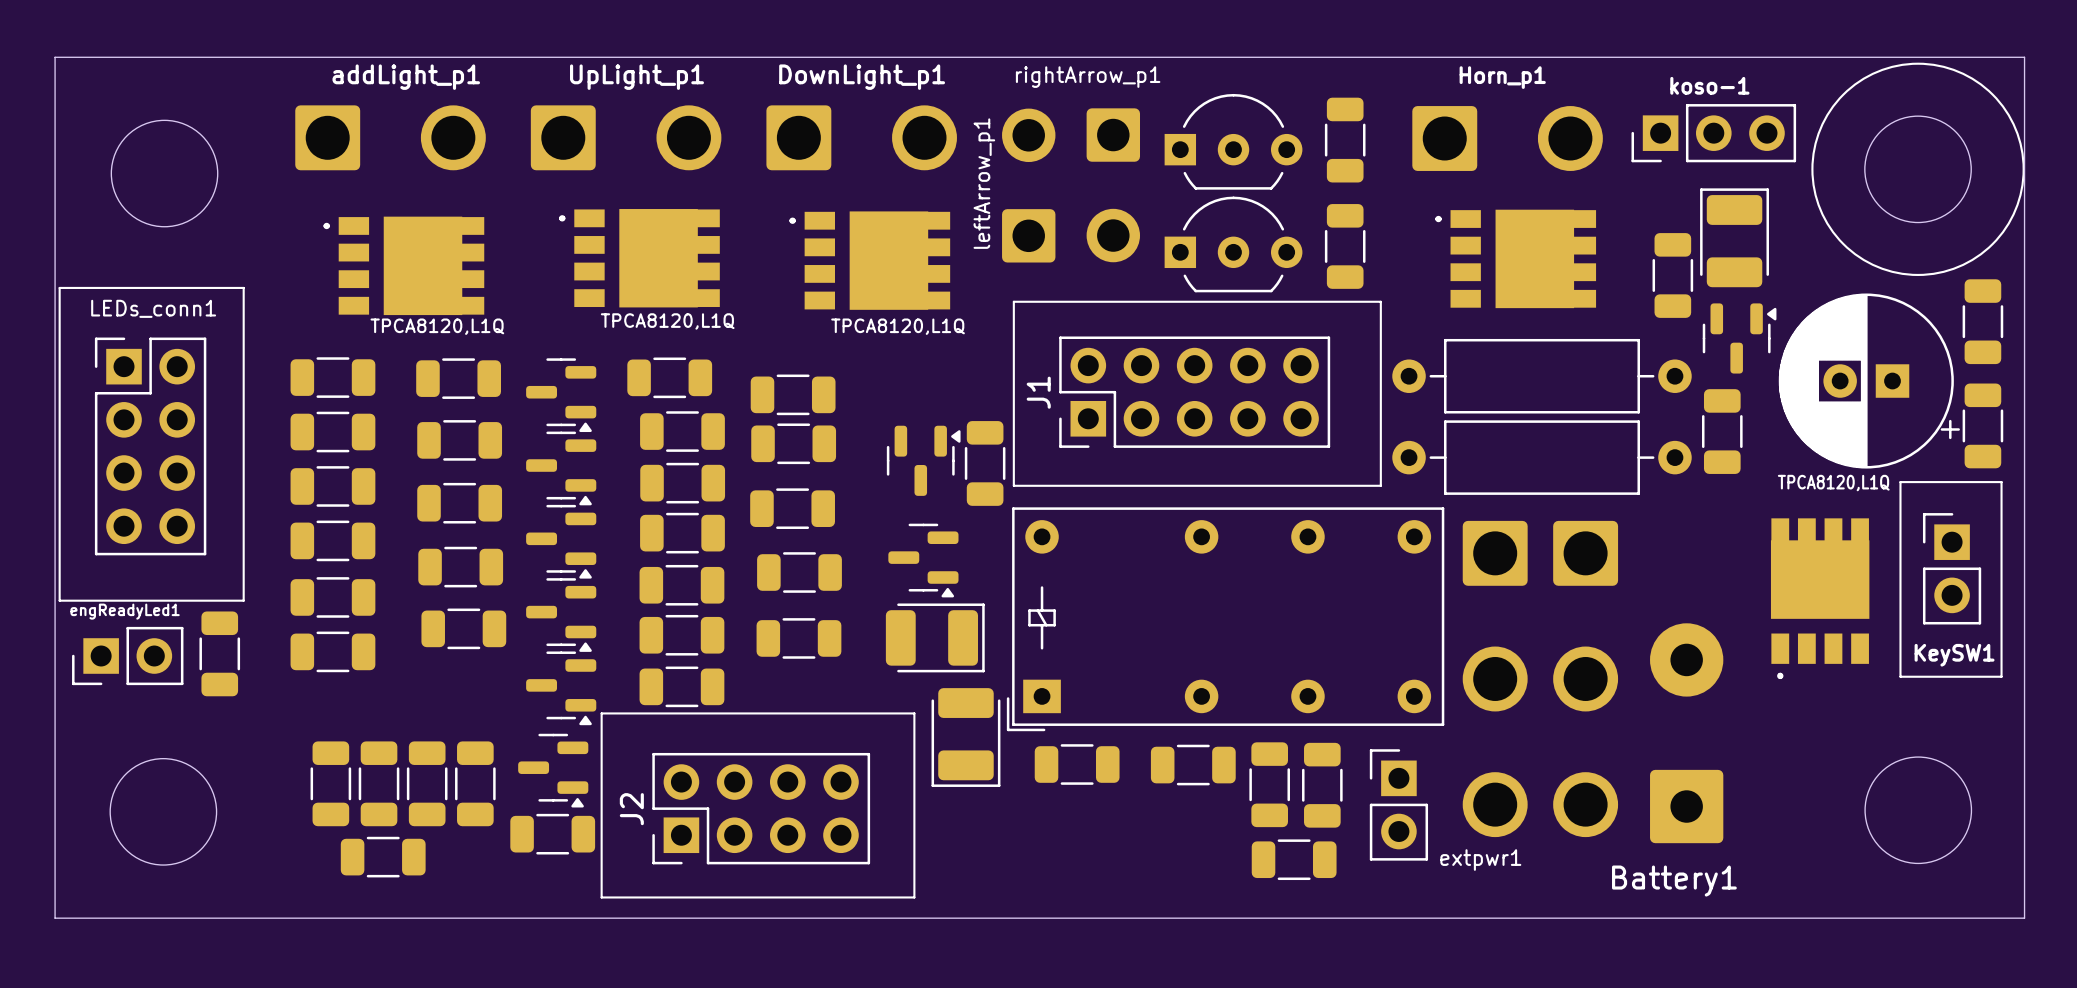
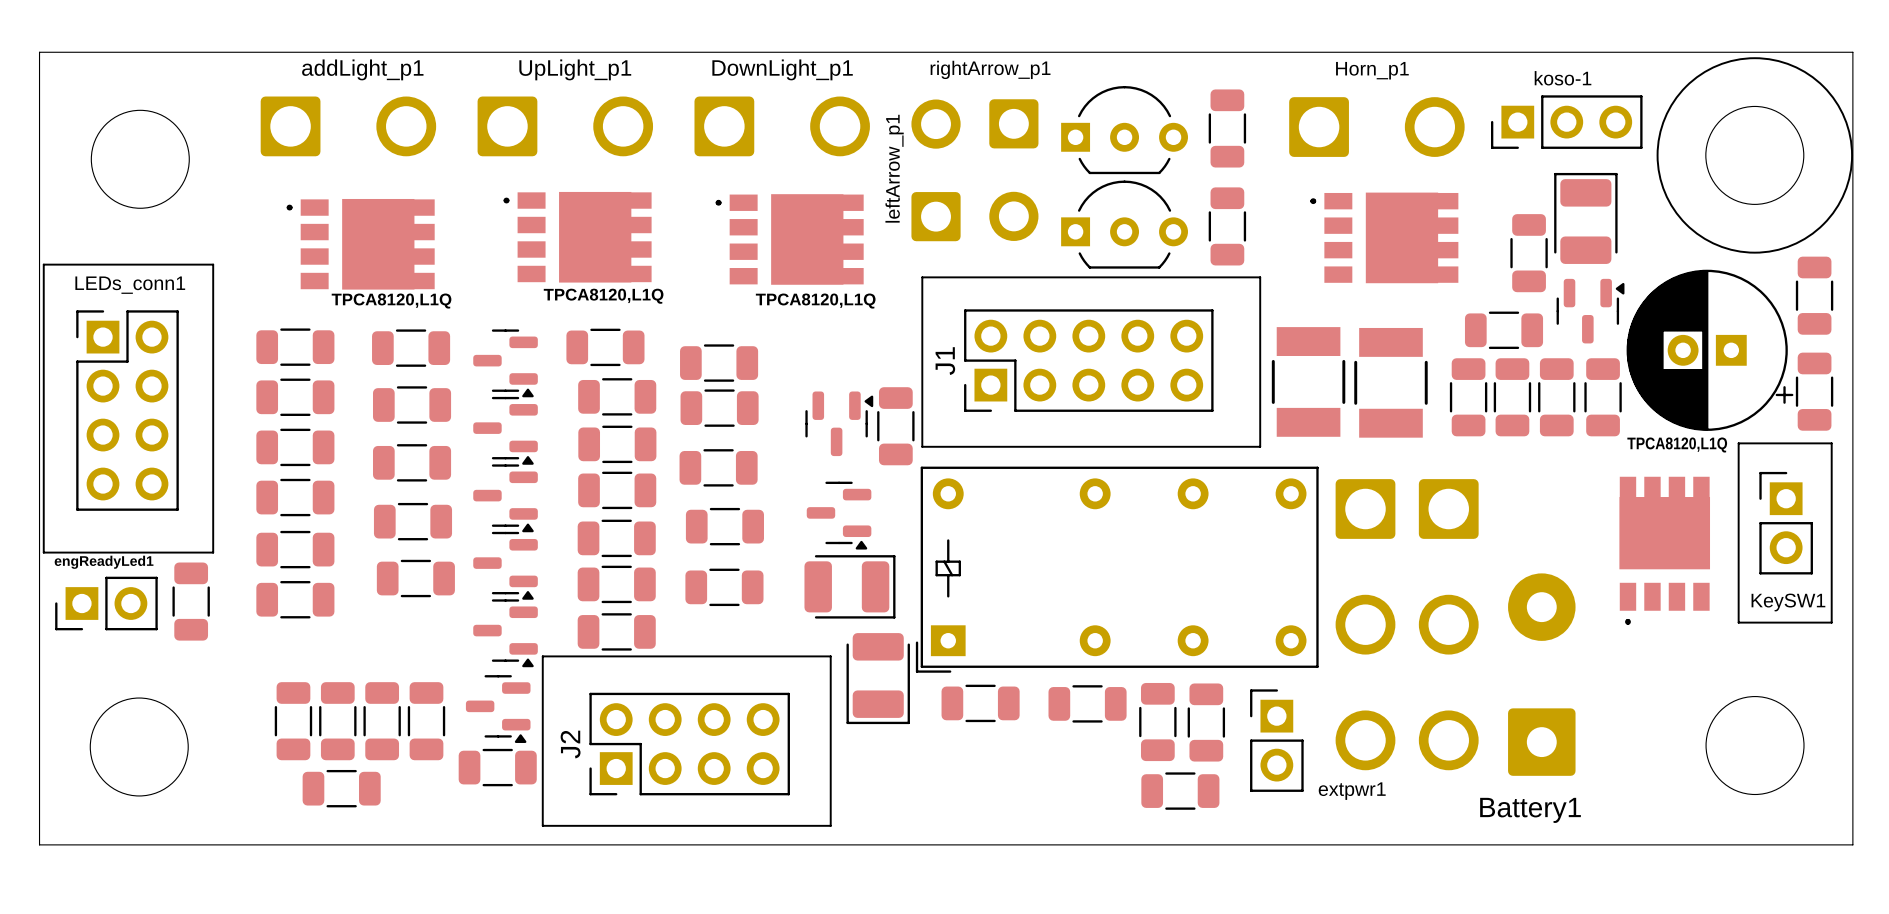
part: none -> (1504, 330)
part: (1542, 376) -> none
part: none -> (1308, 381)
part: none -> (1390, 382)
part: (1722, 431) -> none
part: none -> (1468, 397)
part: none -> (1512, 397)
part: none -> (1556, 397)
part: none -> (1603, 397)
part: (1542, 457) -> none

